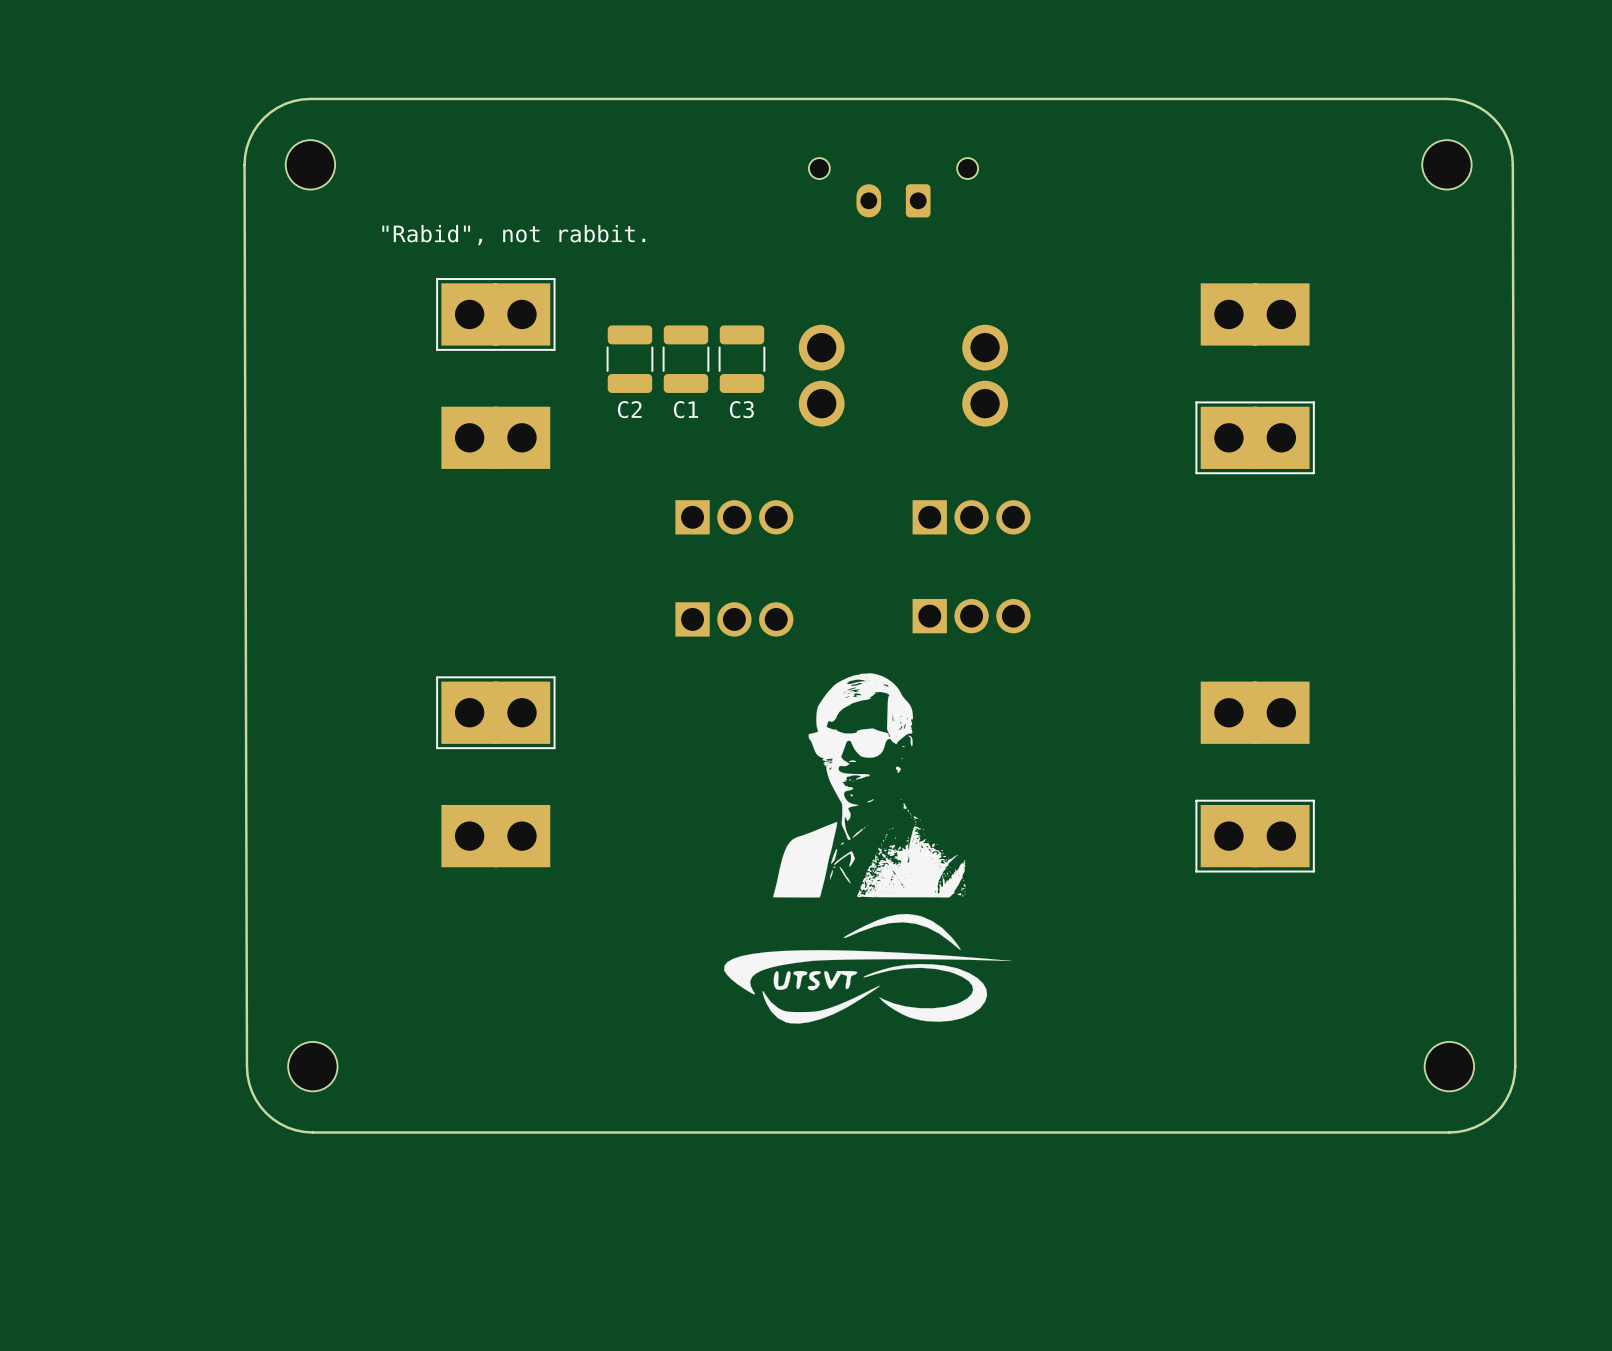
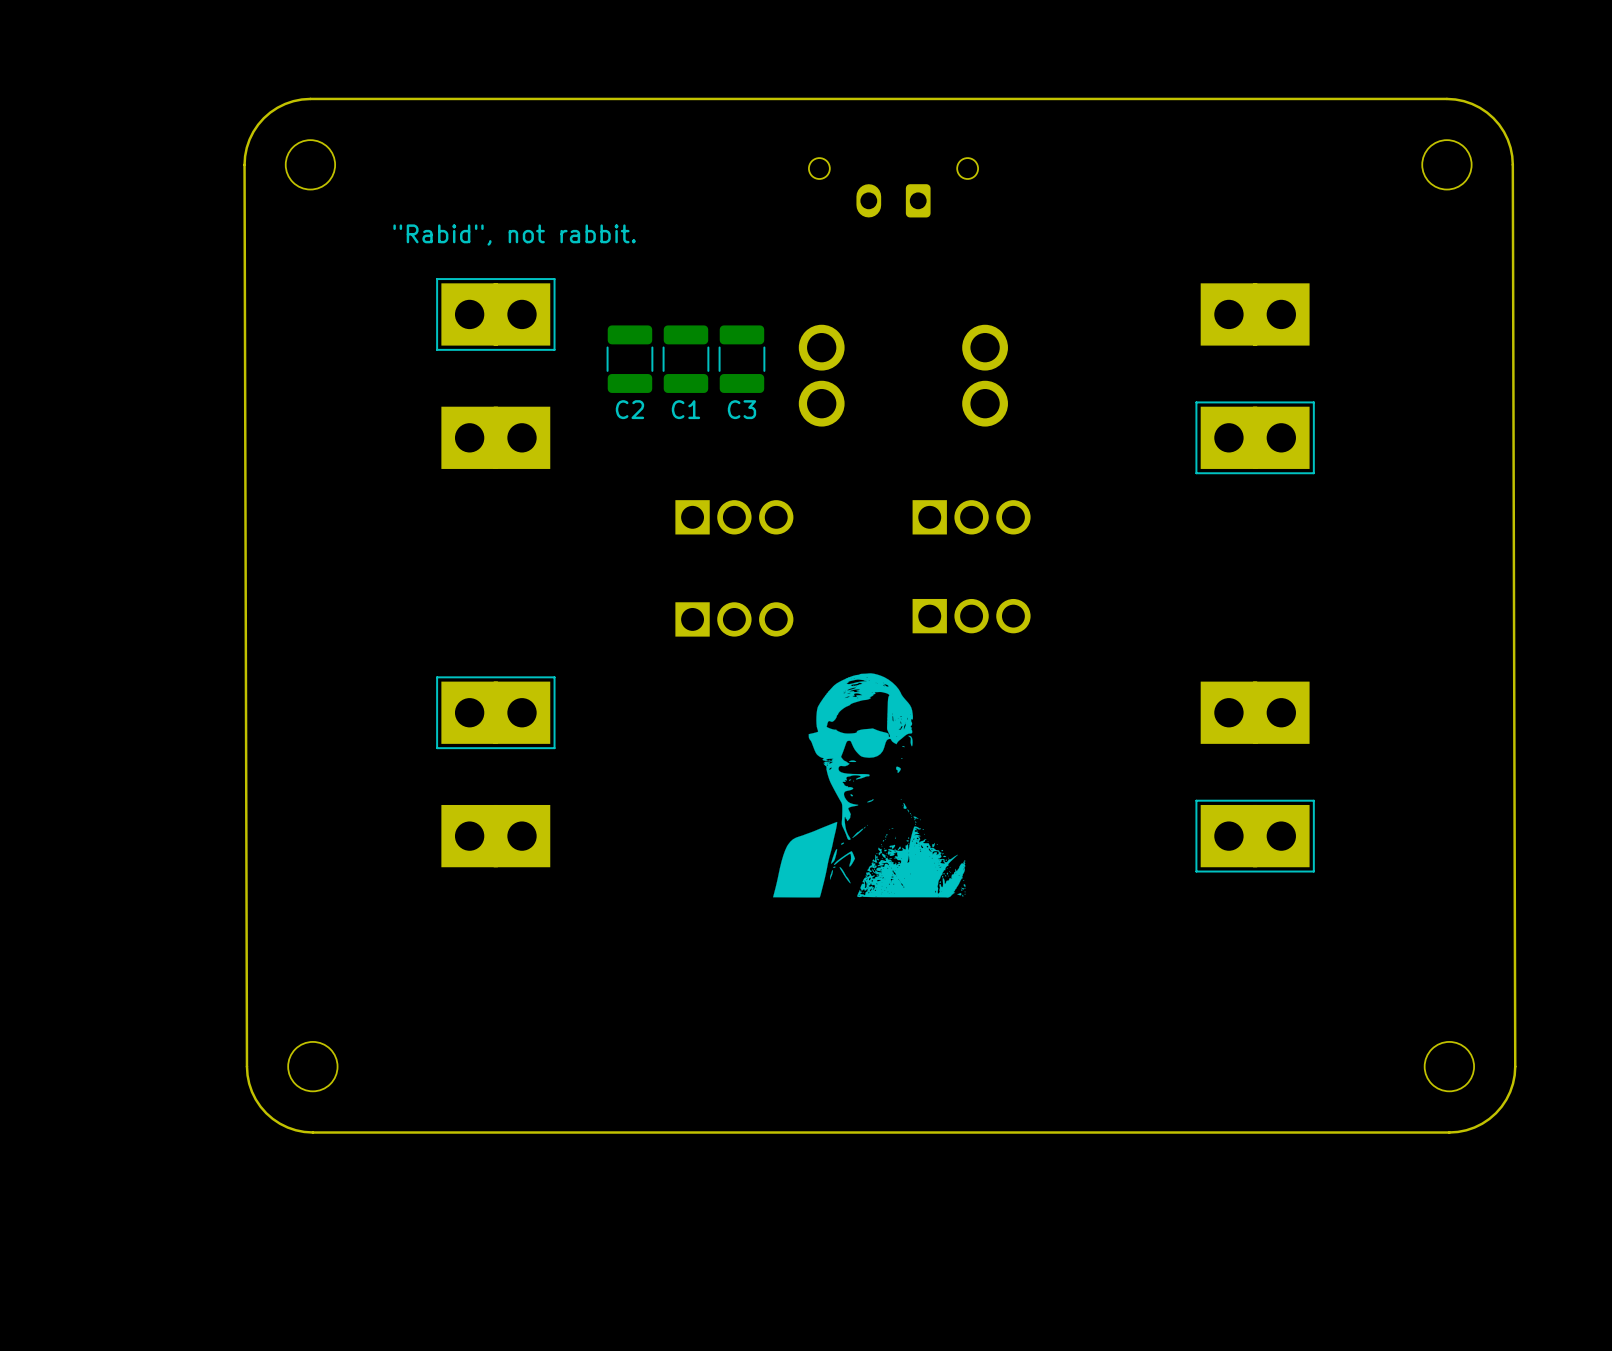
drawing: [724, 913, 1012, 1024] -> none

